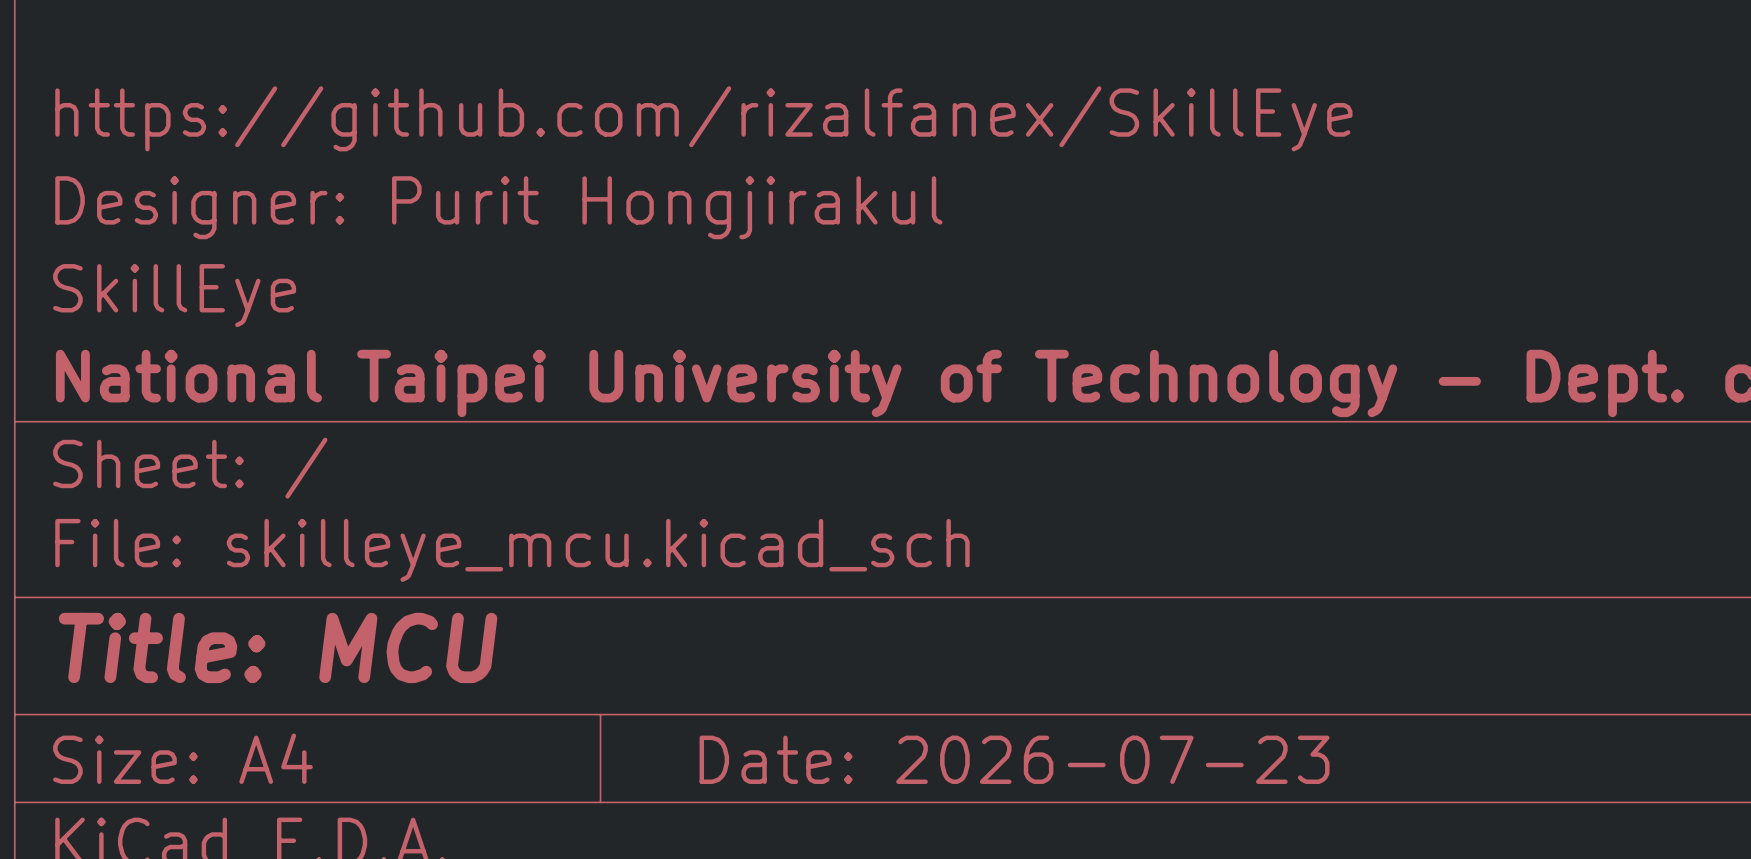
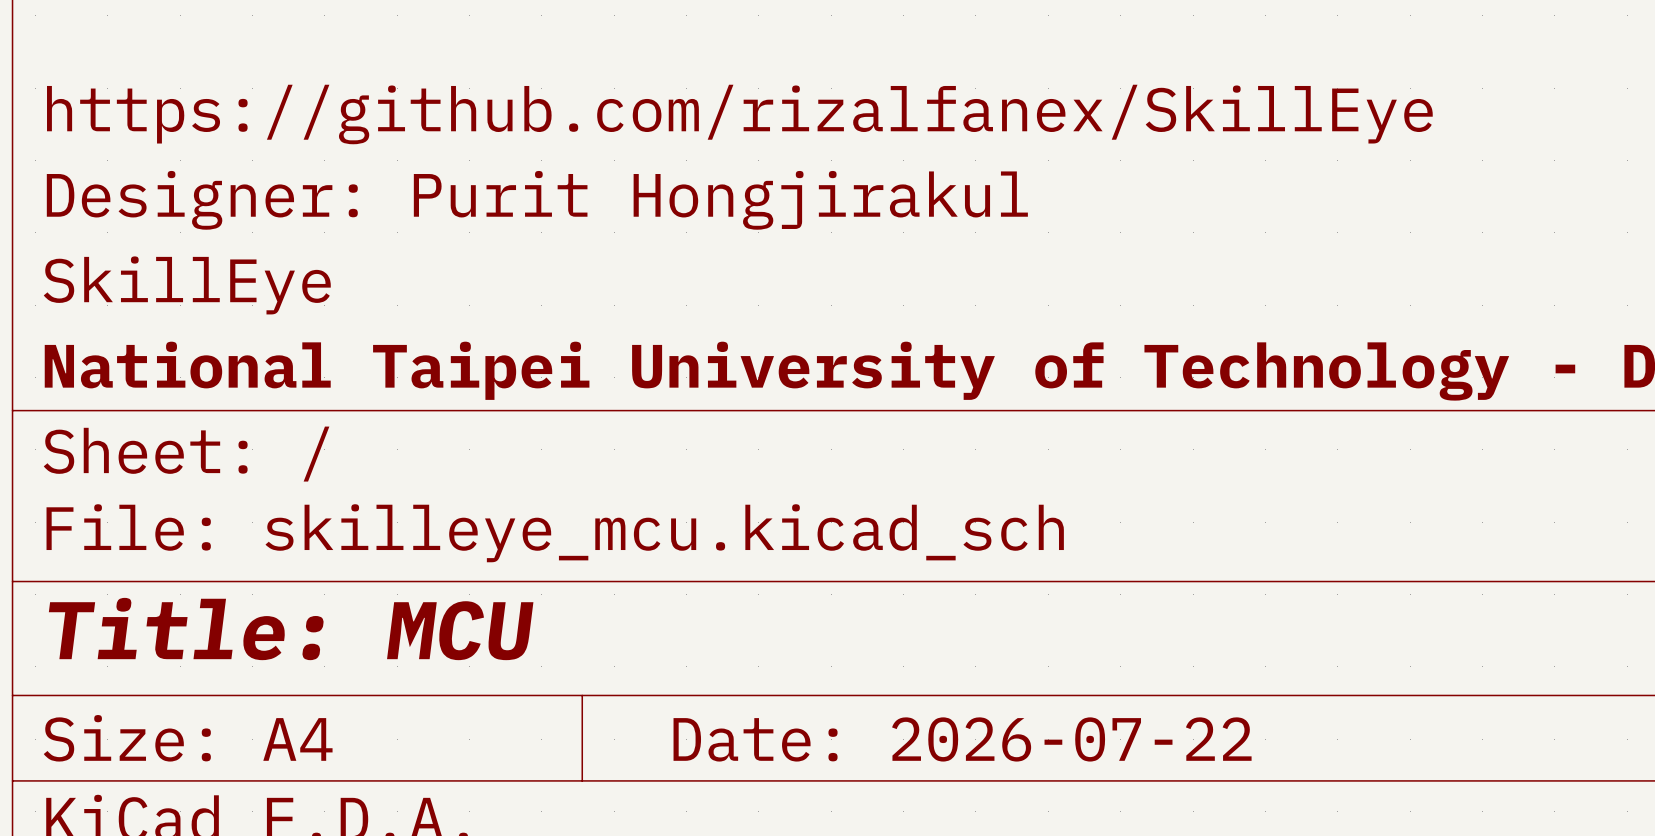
title block: Date: 2026-07-23 (1014, 759) -> Date: 2026-07-22 (962, 739)

